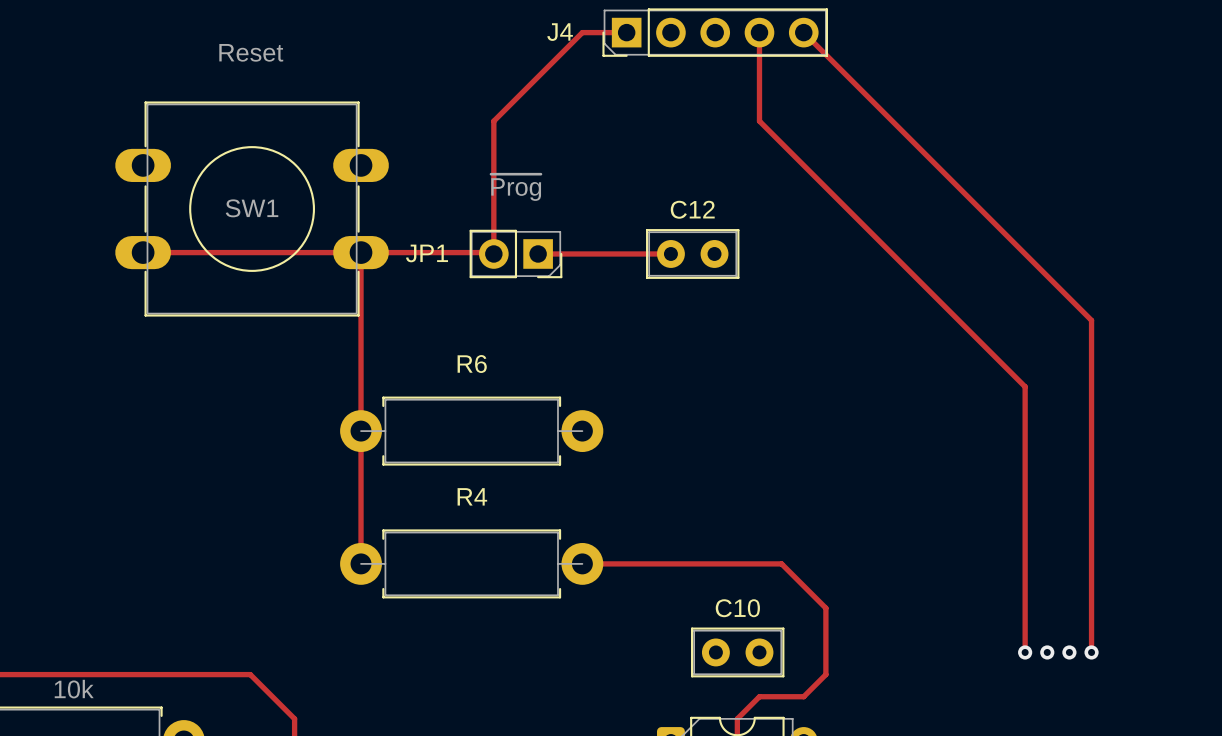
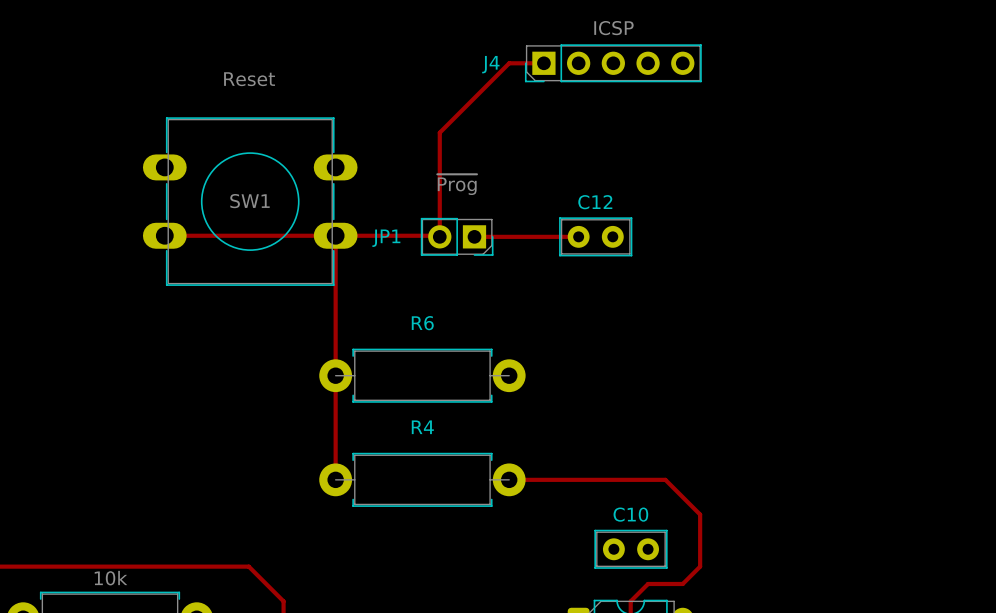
track: (759, 32) (759, 121) (1025, 386) (1025, 652) -> none
track: (803, 32) (1091, 320) (1091, 652) -> none
via: (1025, 652) -> none
via: (1047, 652) -> none
via: (1069, 652) -> none
via: (1091, 652) -> none

